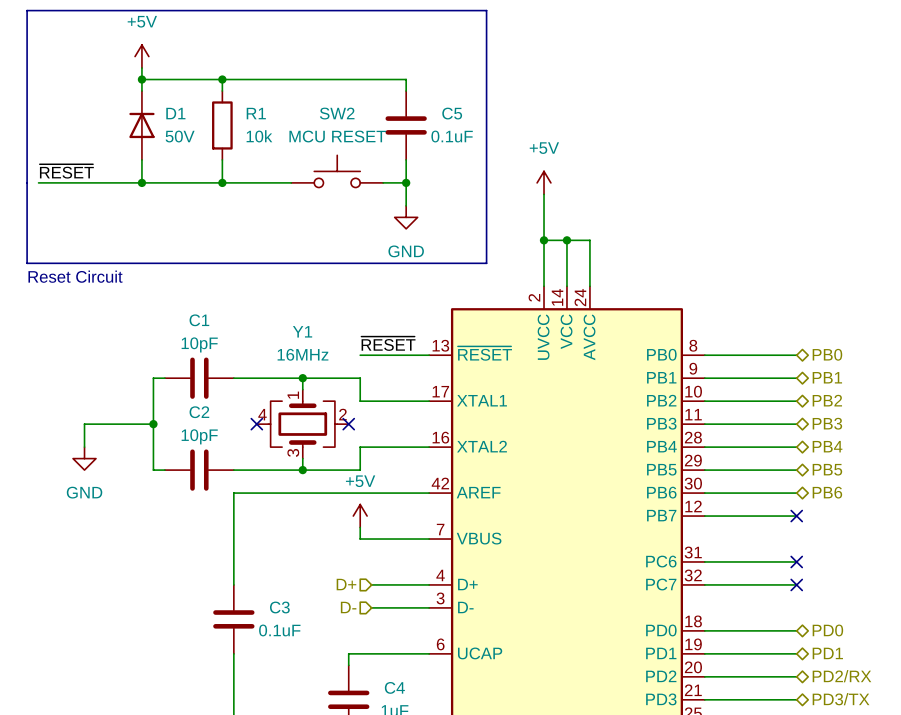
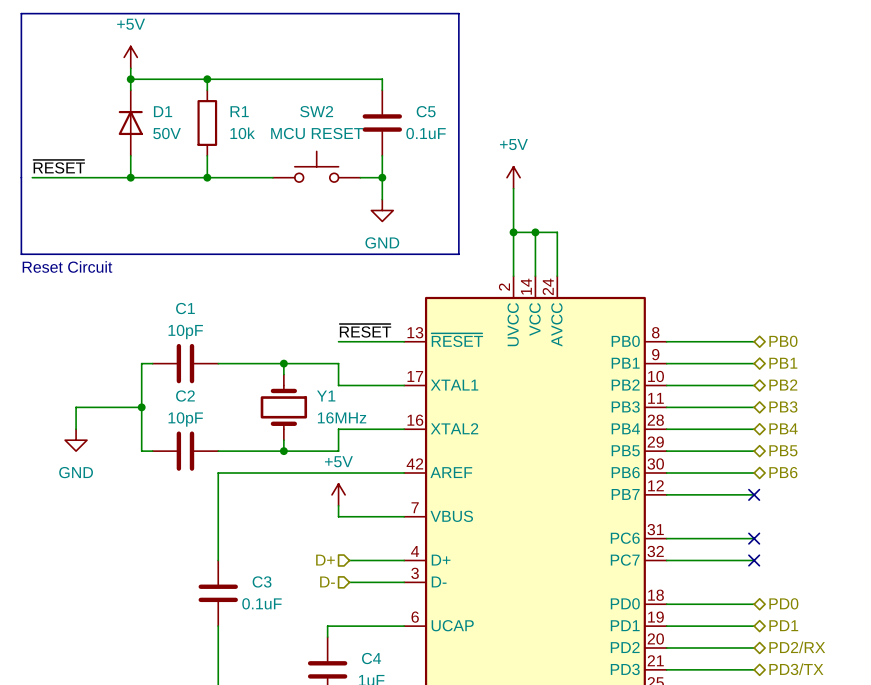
Y1 name position: Y1 (302, 331) -> Y1 (326, 396)
Y1 value position: 16MHz (302, 354) -> 16MHz (342, 417)
Y1 symbol: [256, 389, 349, 459] -> [260, 374, 308, 441]
no-connect mark: (256, 424) -> none
no-connect mark: (348, 424) -> none

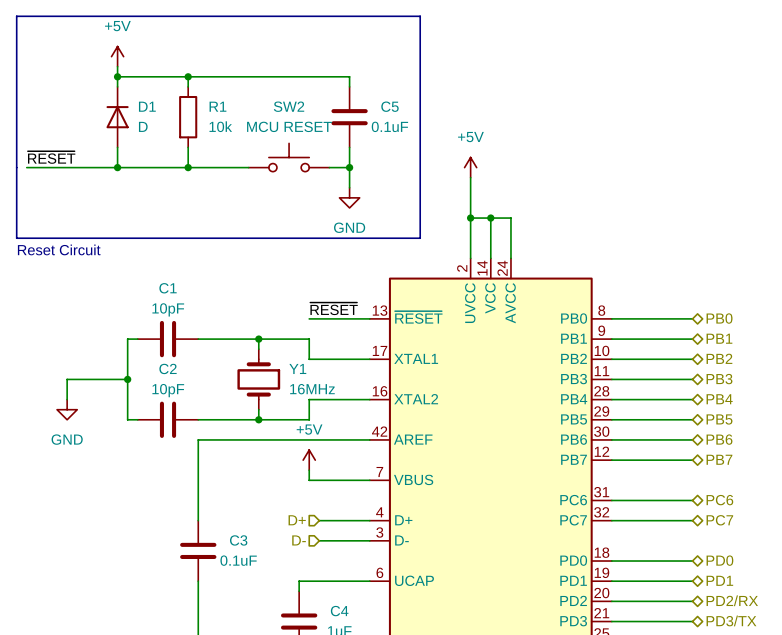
D1 value: 50V (167, 133) -> D (143, 126)
no-connect mark: (754, 494) -> none
hierarchical label: none -> PB7 (719, 459)
no-connect mark: (754, 538) -> none
hierarchical label: none -> PC6 (719, 500)
no-connect mark: (754, 560) -> none
hierarchical label: none -> PC7 (719, 520)

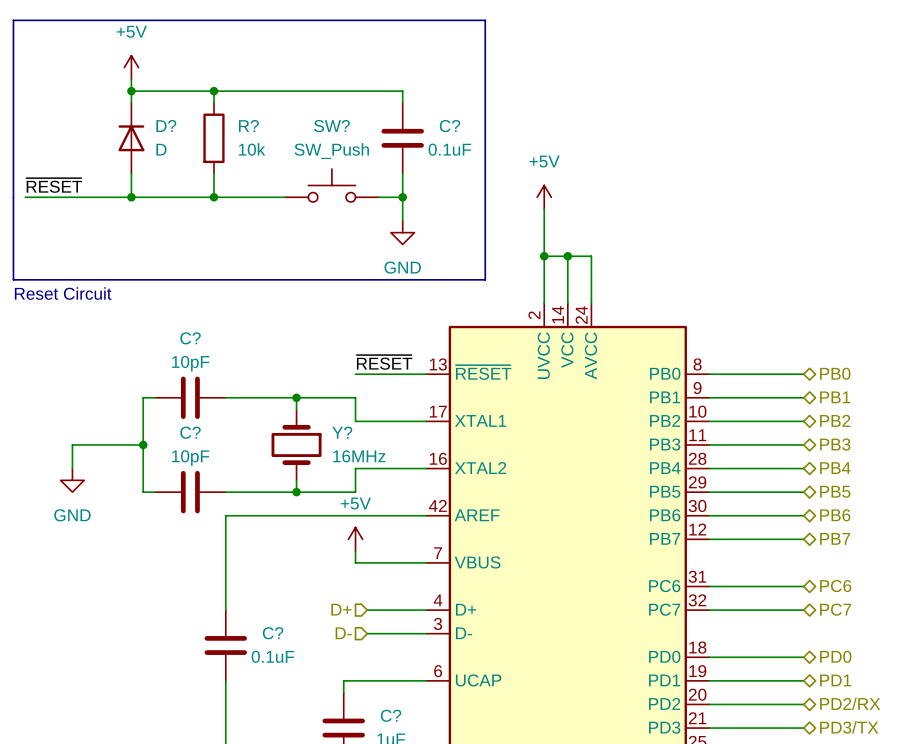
D1 name: D1 (147, 106) -> D? (166, 125)
R1 name: R1 (217, 106) -> R? (248, 125)
SW2 name: SW2 (289, 106) -> SW? (332, 126)
C5 name: C5 (389, 106) -> C? (449, 126)
SW2 value: MCU RESET (289, 126) -> SW_Push (331, 151)
C1 name: C1 (168, 288) -> C? (190, 338)
C2 name: C2 (168, 368) -> C? (190, 432)
Y1 name: Y1 (297, 368) -> Y? (342, 432)
C3 name: C3 (238, 540) -> C? (273, 633)
C4 name: C4 (339, 611) -> C? (391, 715)

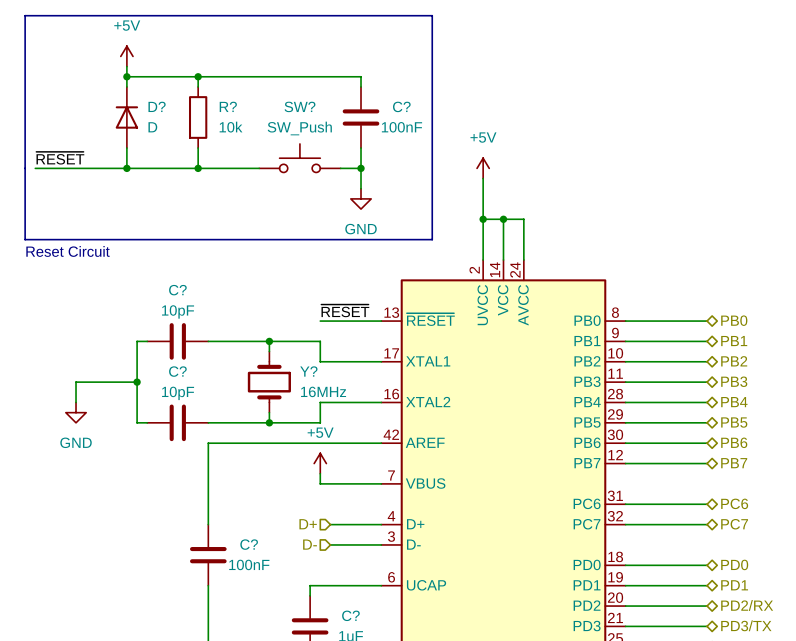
C? value: 0.1uF (449, 149) -> 100nF (401, 127)
C? value: 0.1uF (272, 656) -> 100nF (249, 564)

